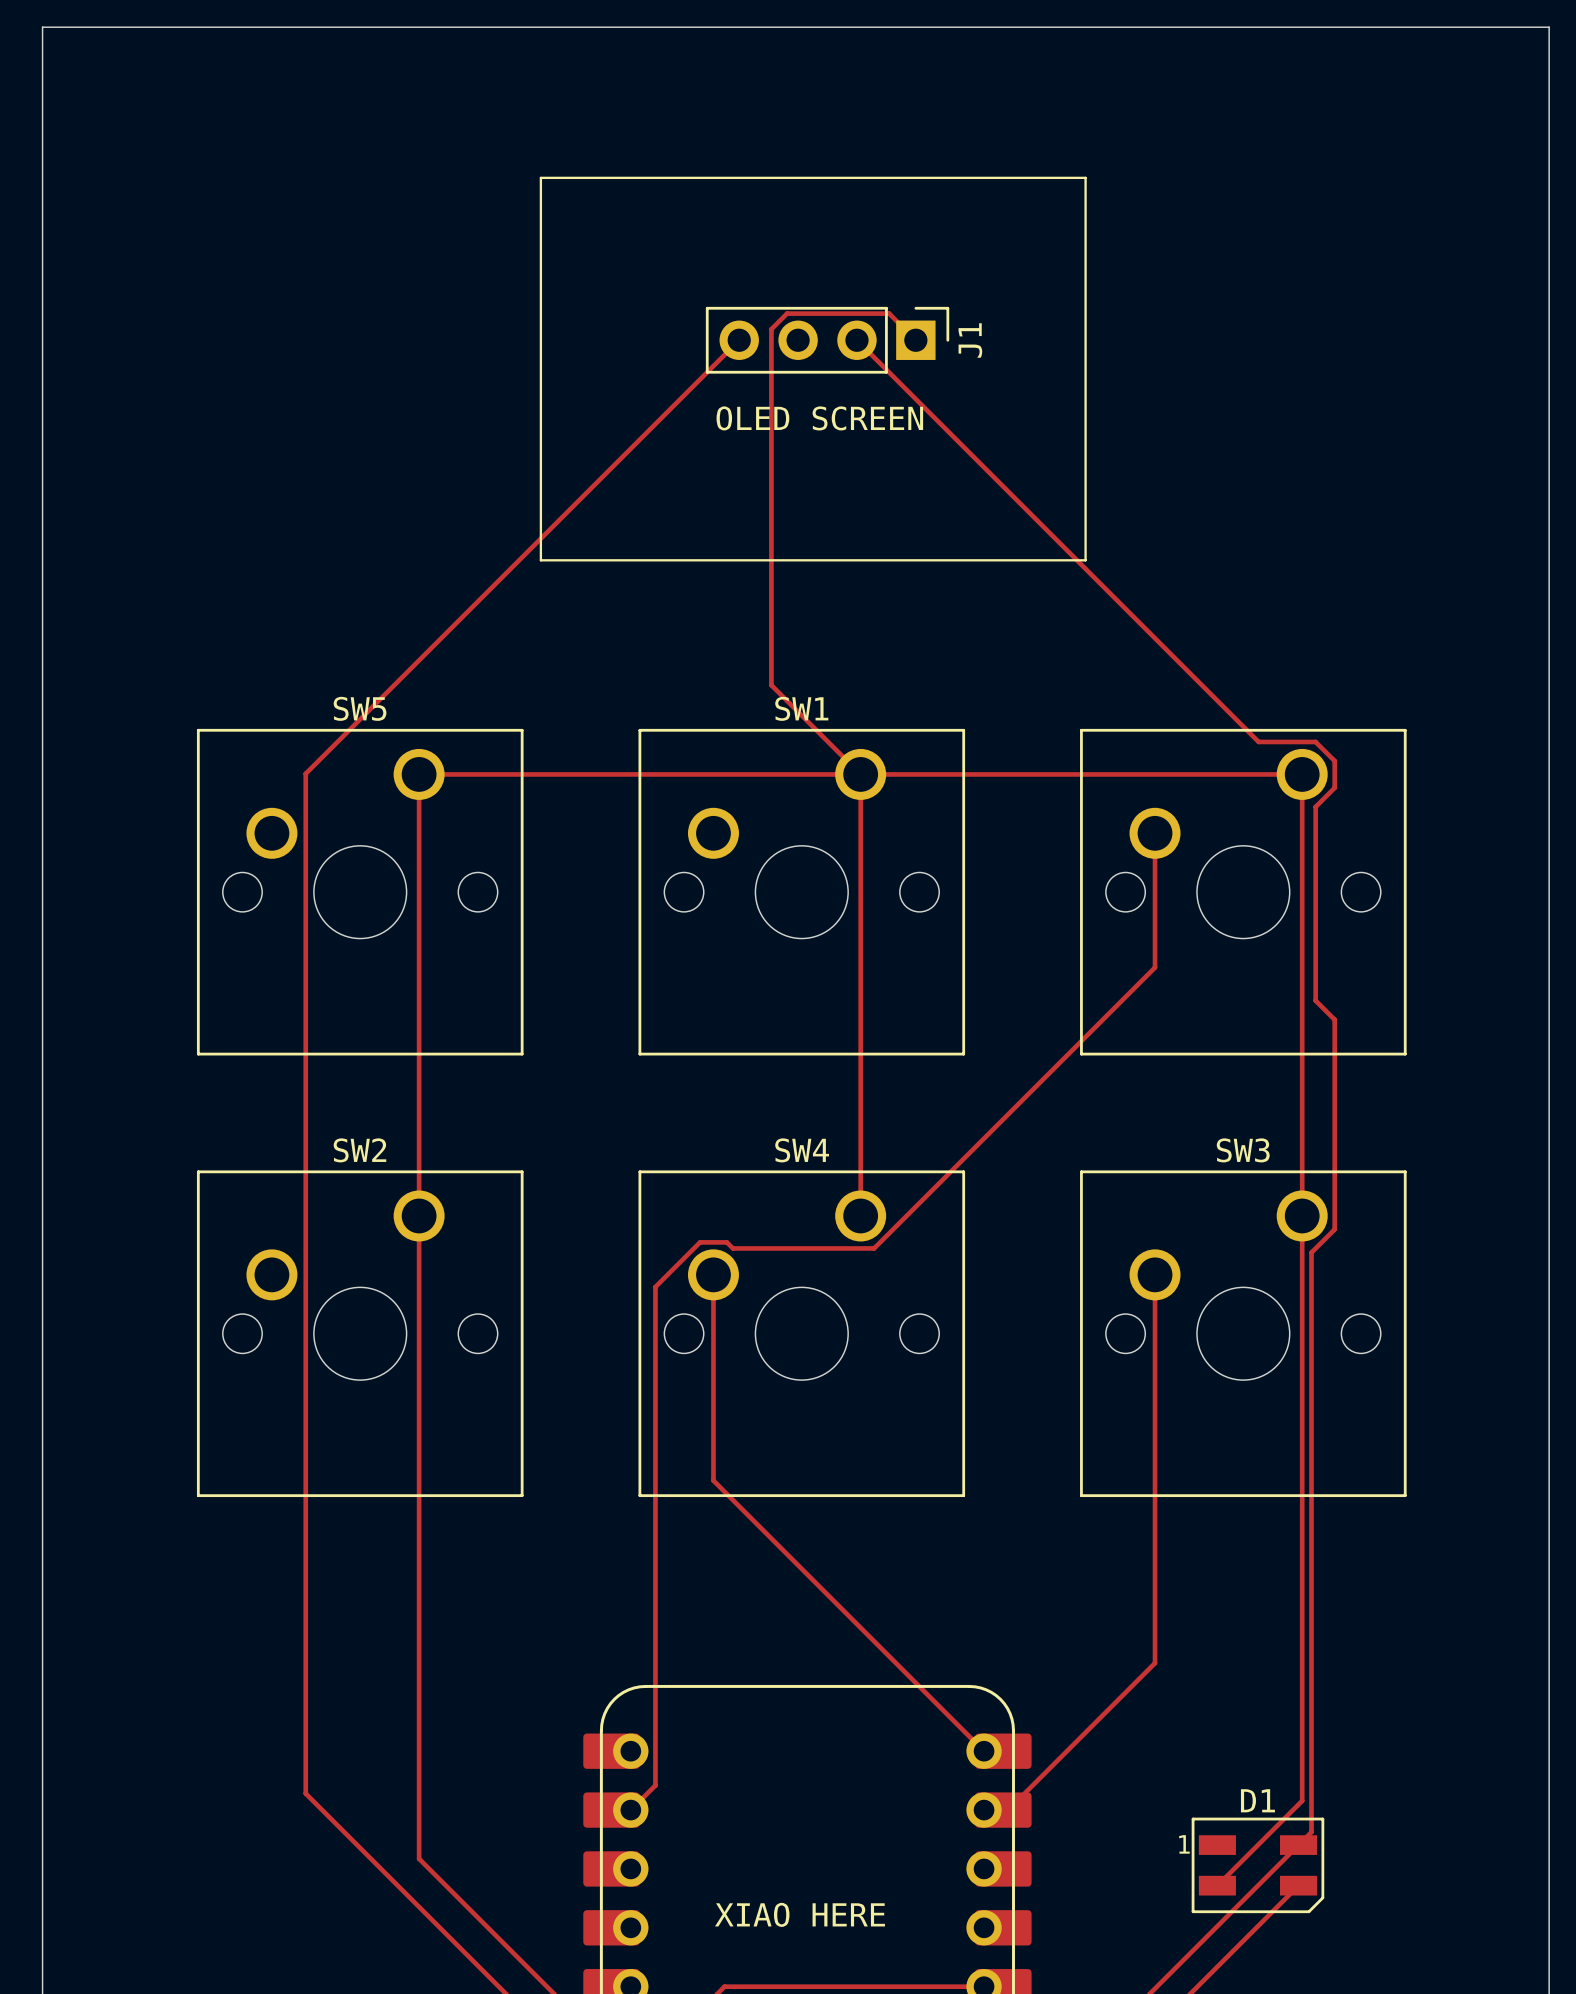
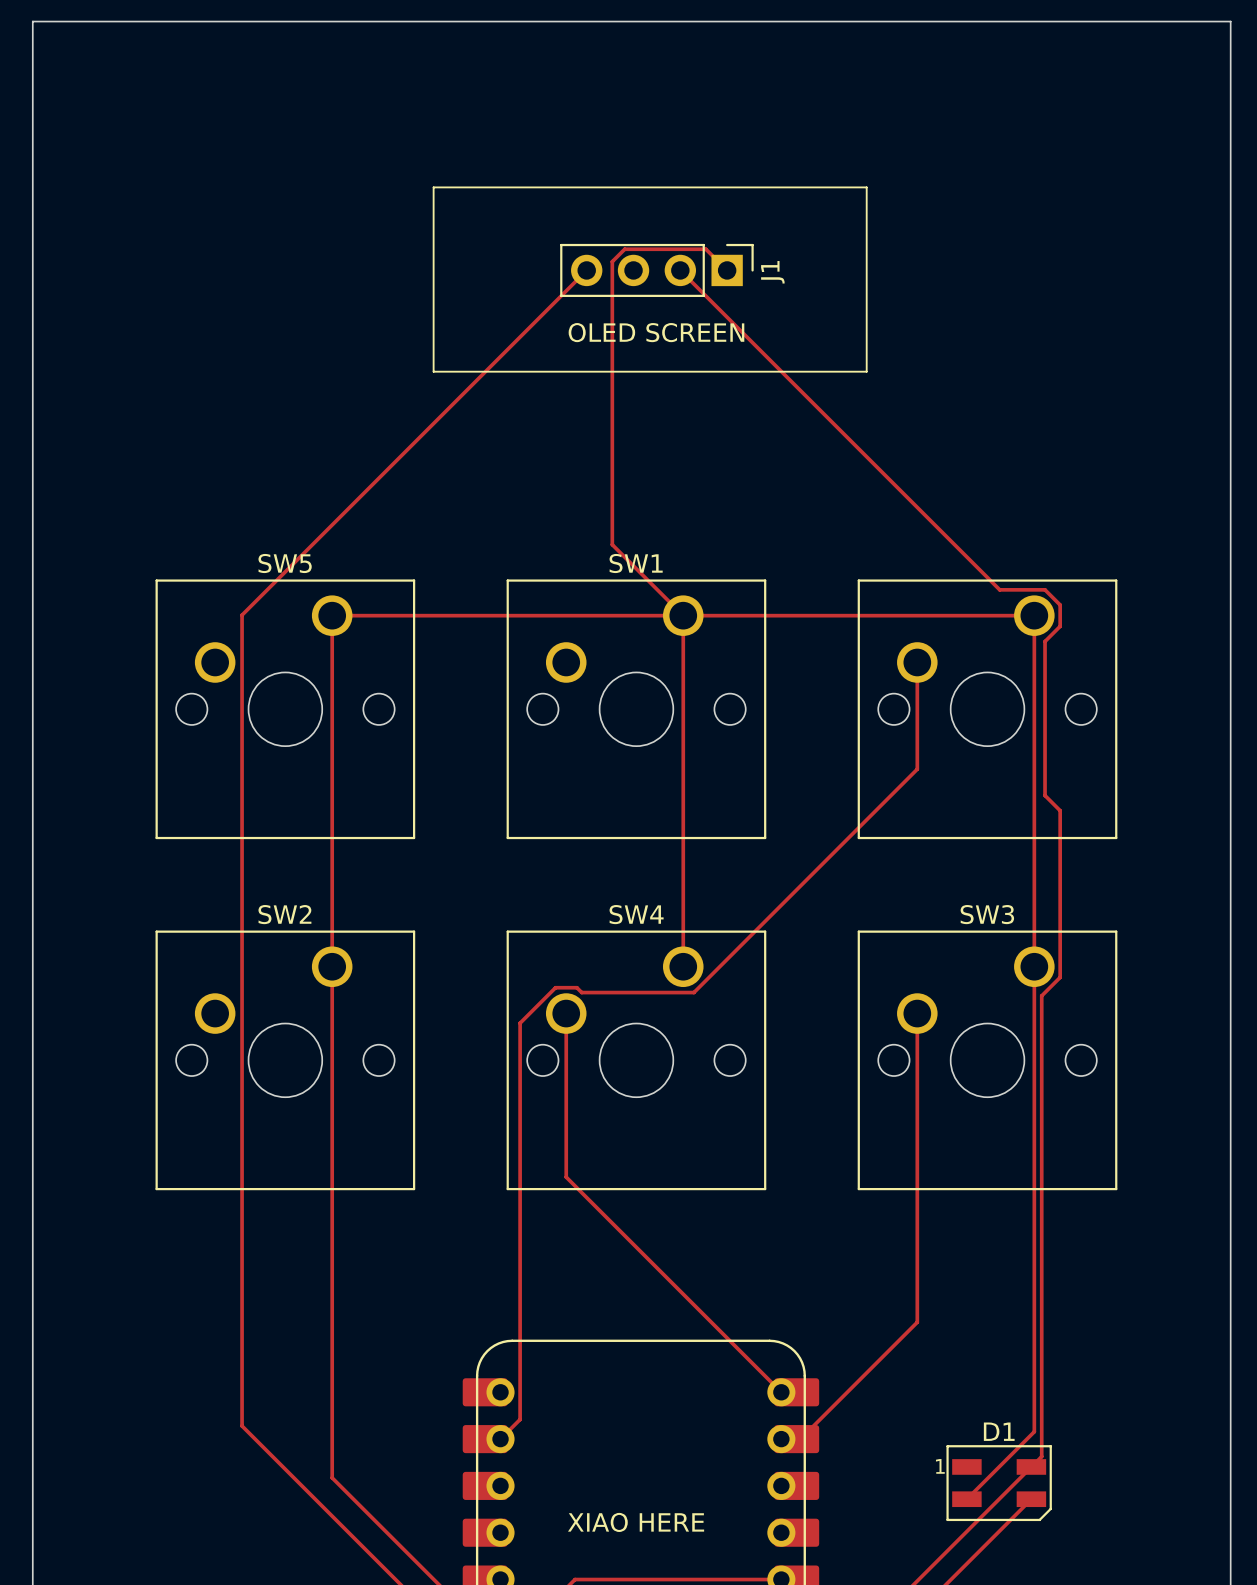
line: (540, 177) (1085, 177) (1085, 560) (540, 560) (540, 177) -> (433, 187) (433, 371) (866, 371) (866, 187) (433, 187)

